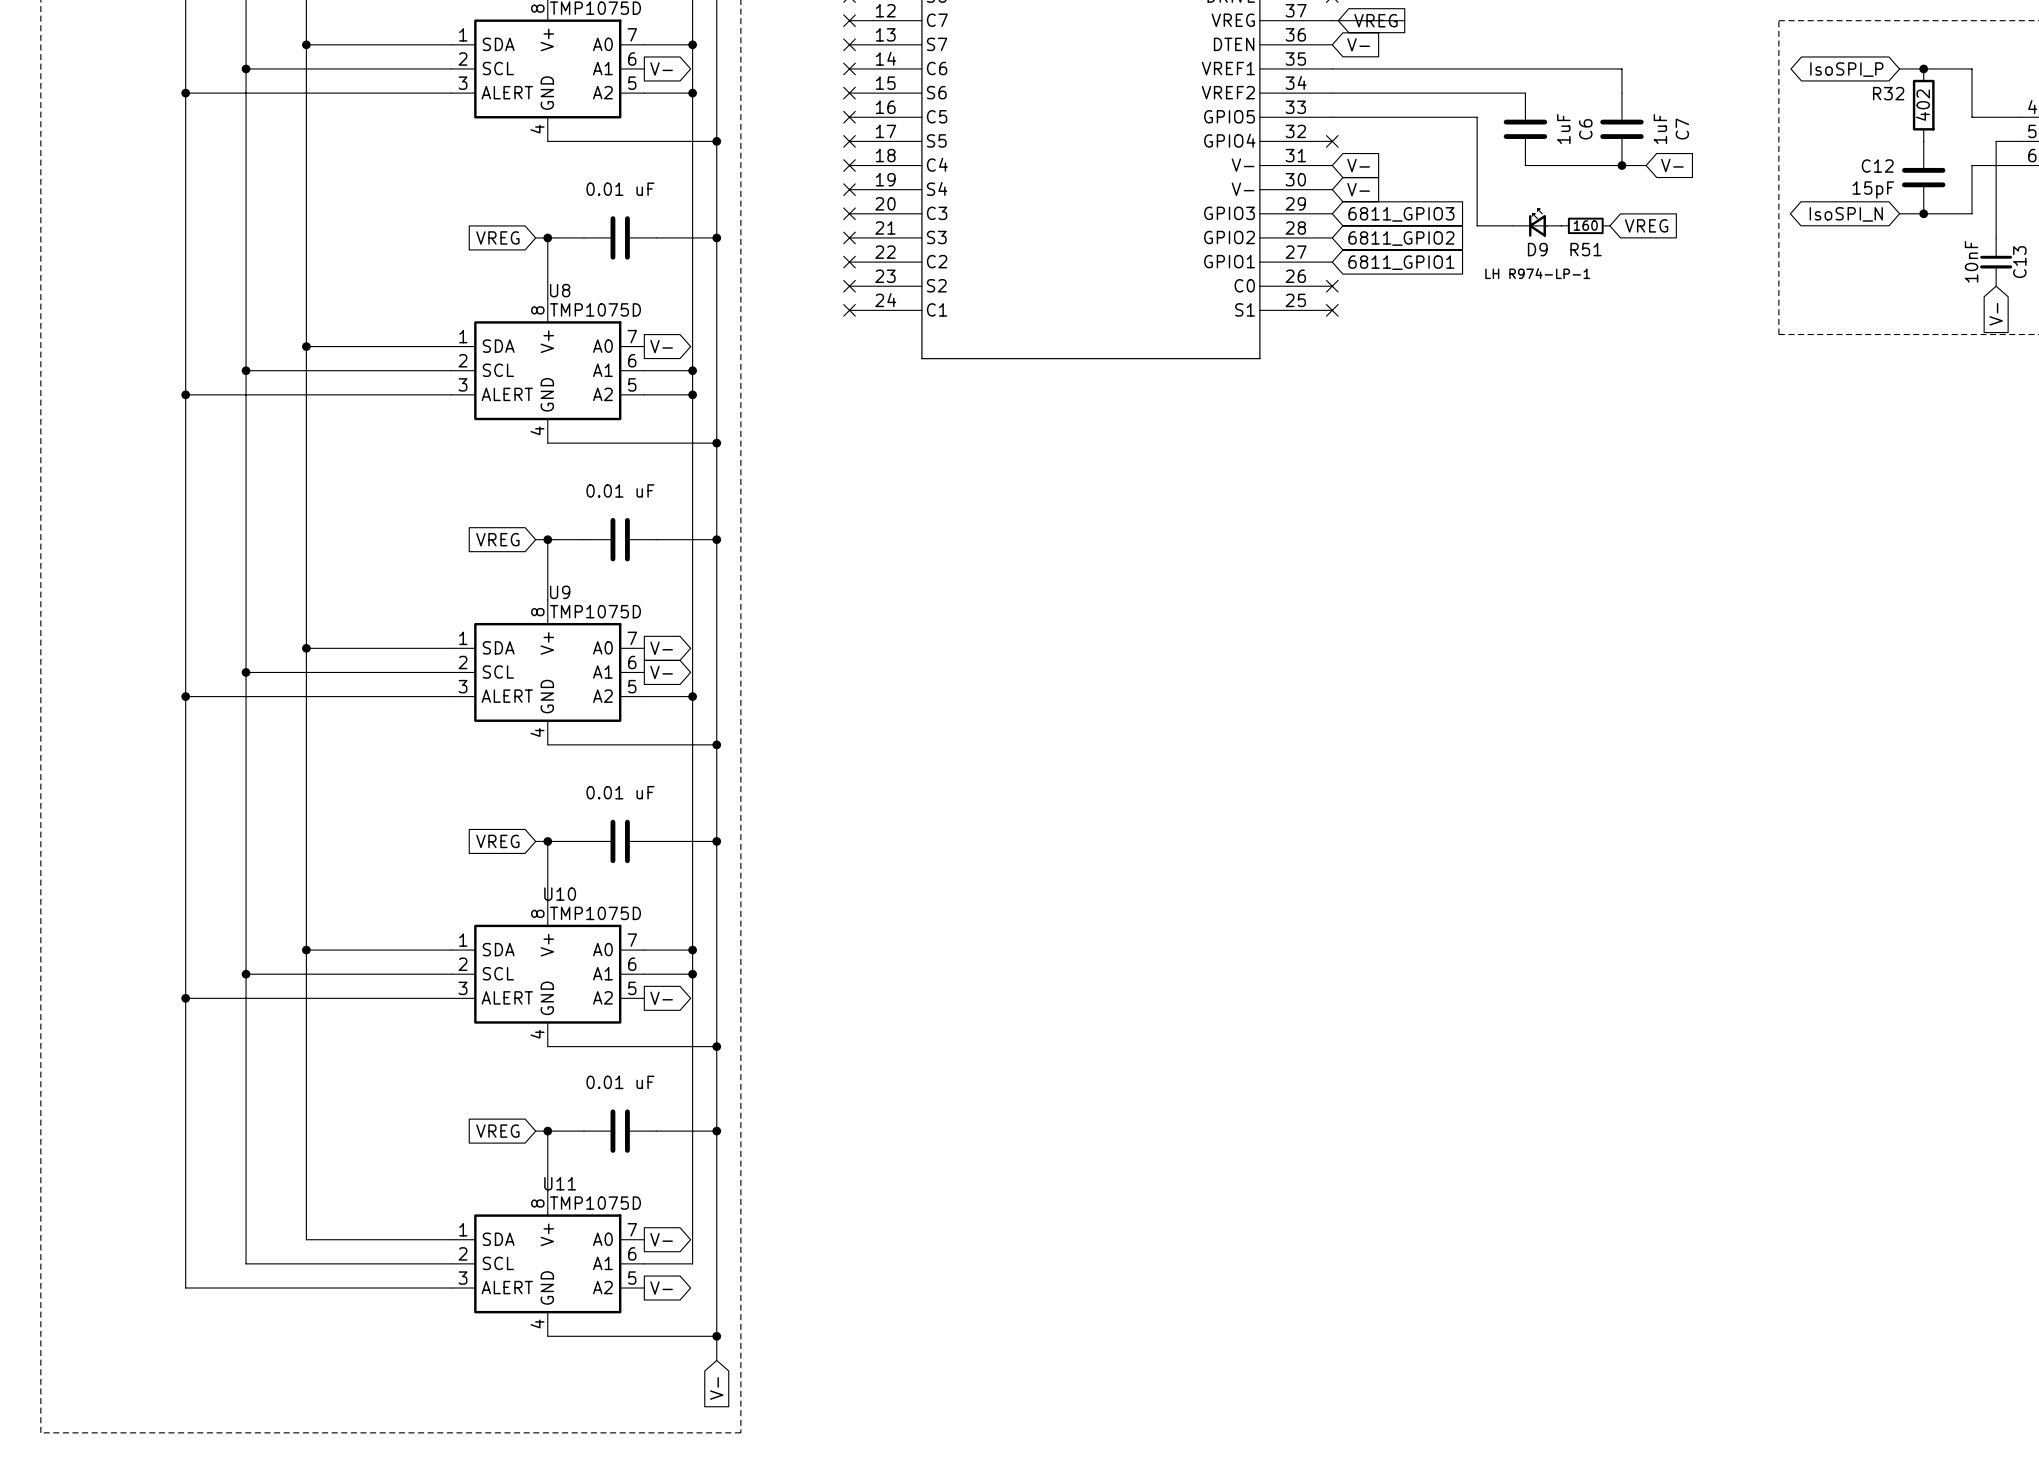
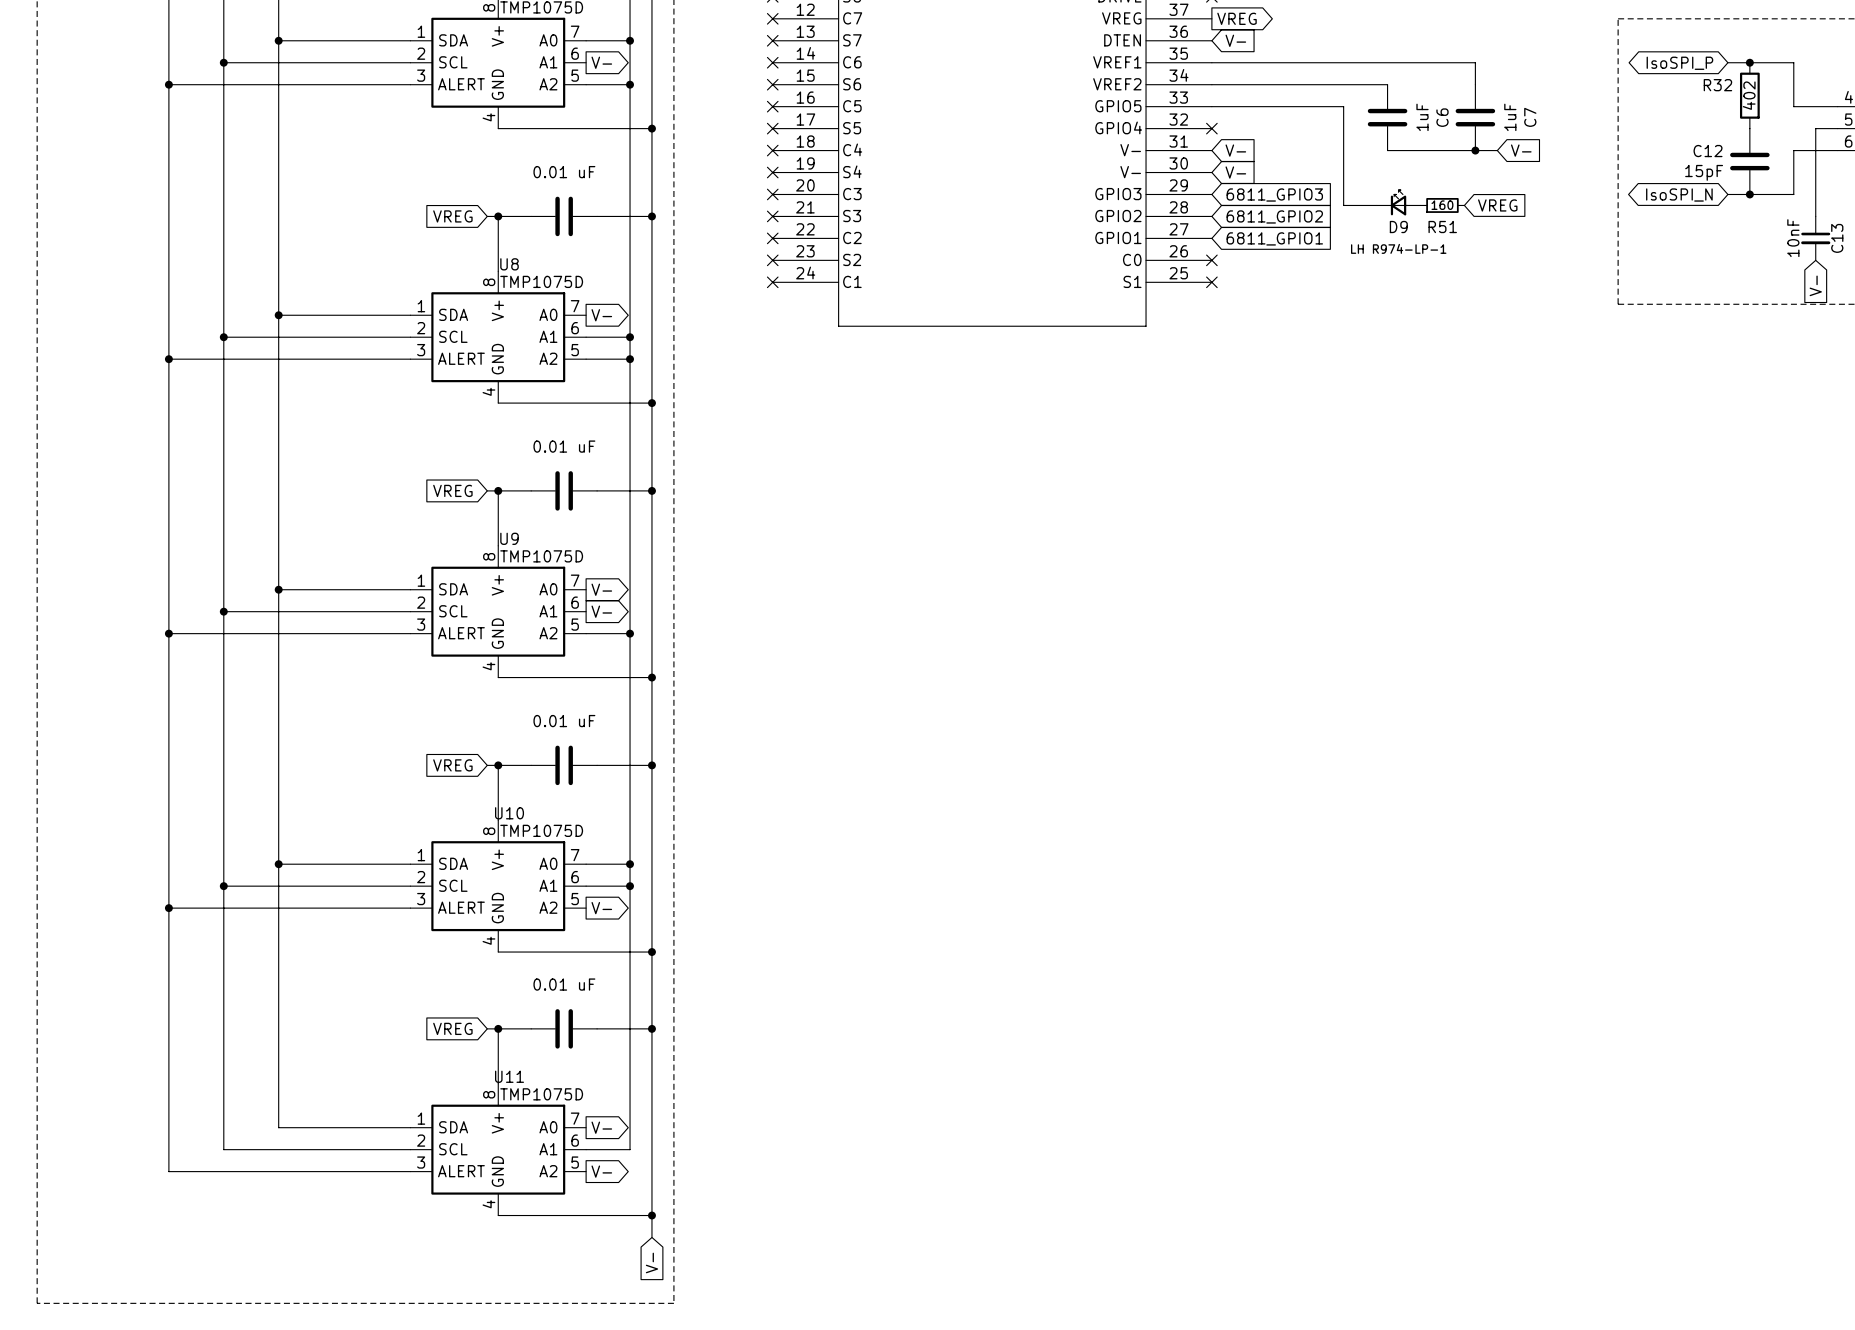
wire: (1332, 20) (1404, 20) -> none
global label rotation: 0° (1375, 20) -> 180° (1237, 18)

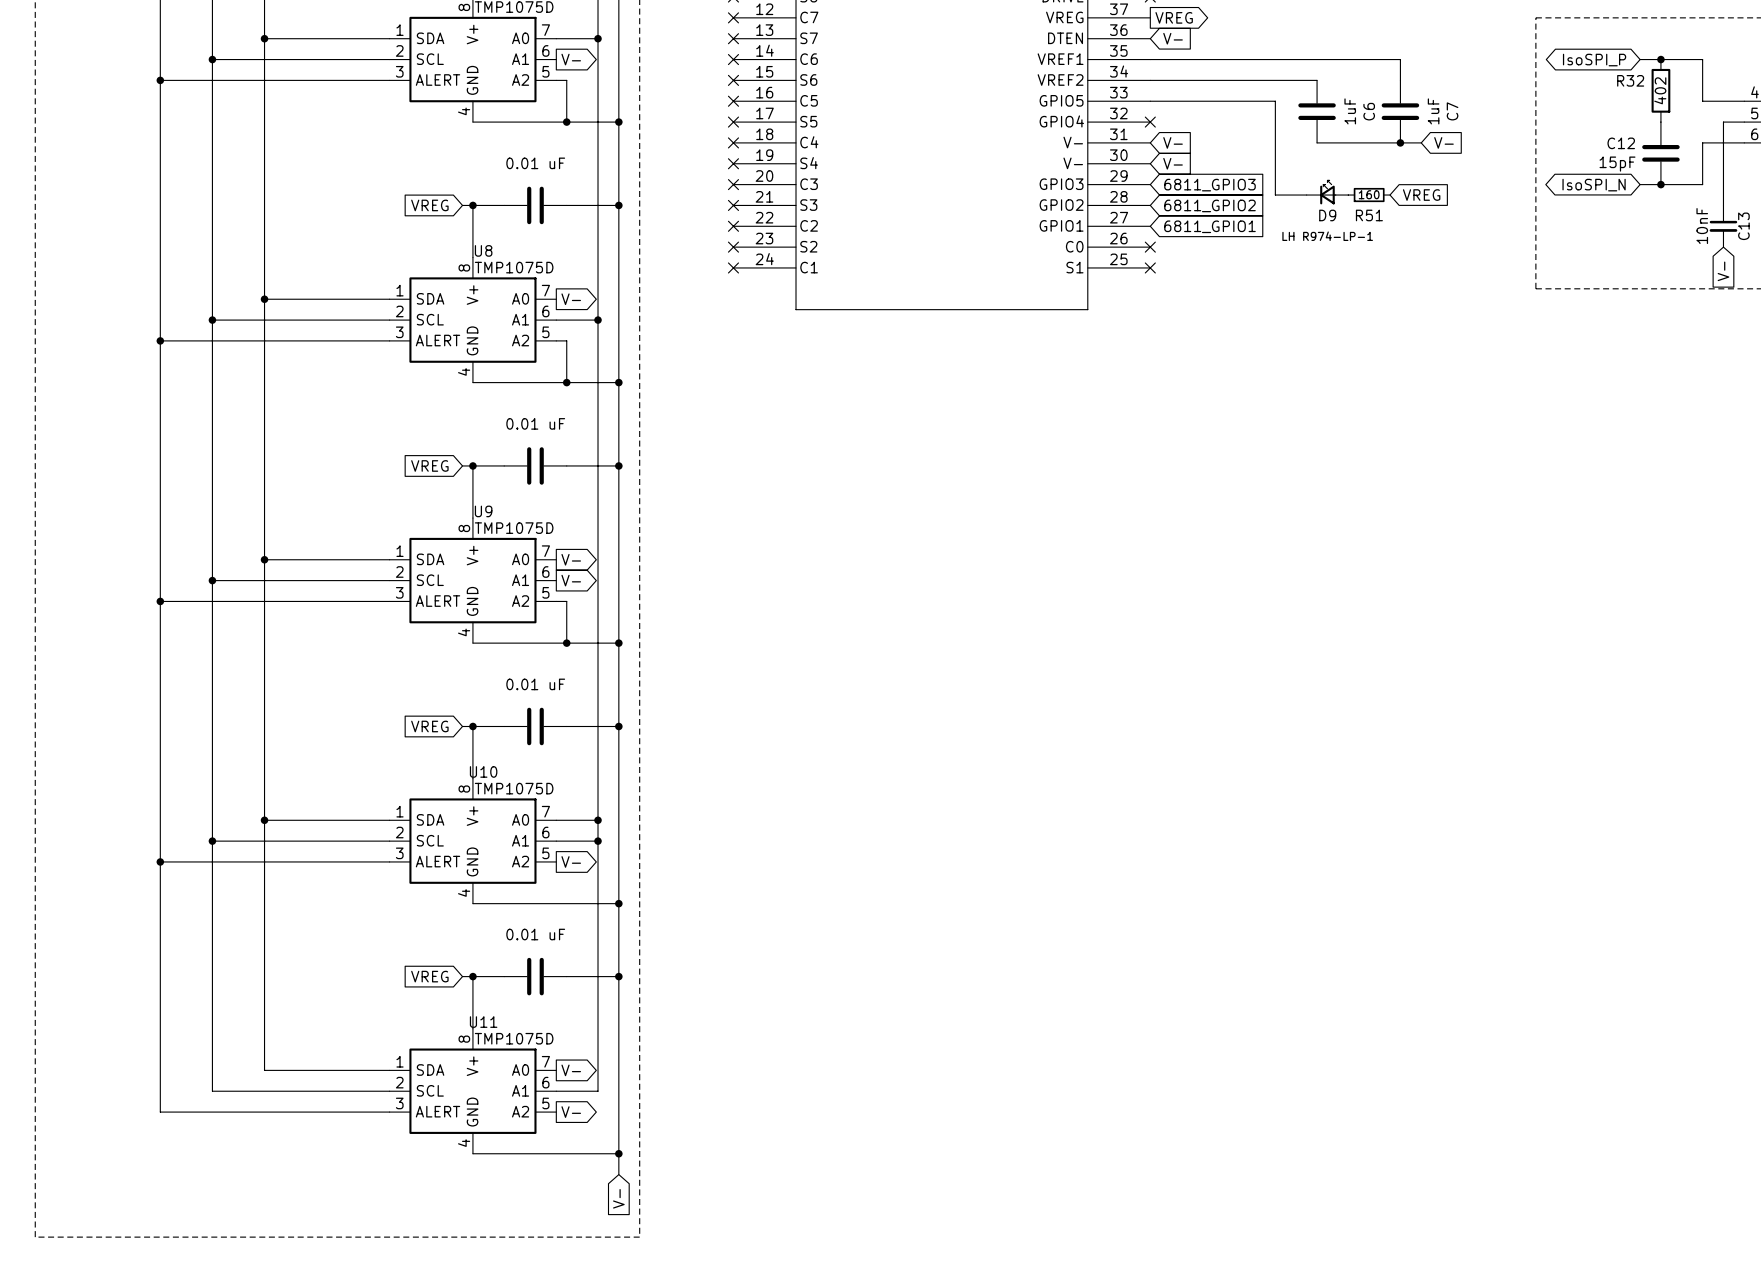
wire: (597, 84) (630, 84) -> (566, 80) (566, 122)
junction: (630, 84) -> none
junction: none -> (566, 122)
wire: (597, 359) (630, 359) -> (566, 340) (566, 382)
junction: (630, 359) -> none
junction: none -> (566, 382)
wire: (597, 633) (630, 633) -> (566, 601) (566, 643)
junction: (630, 633) -> none
junction: none -> (566, 643)

